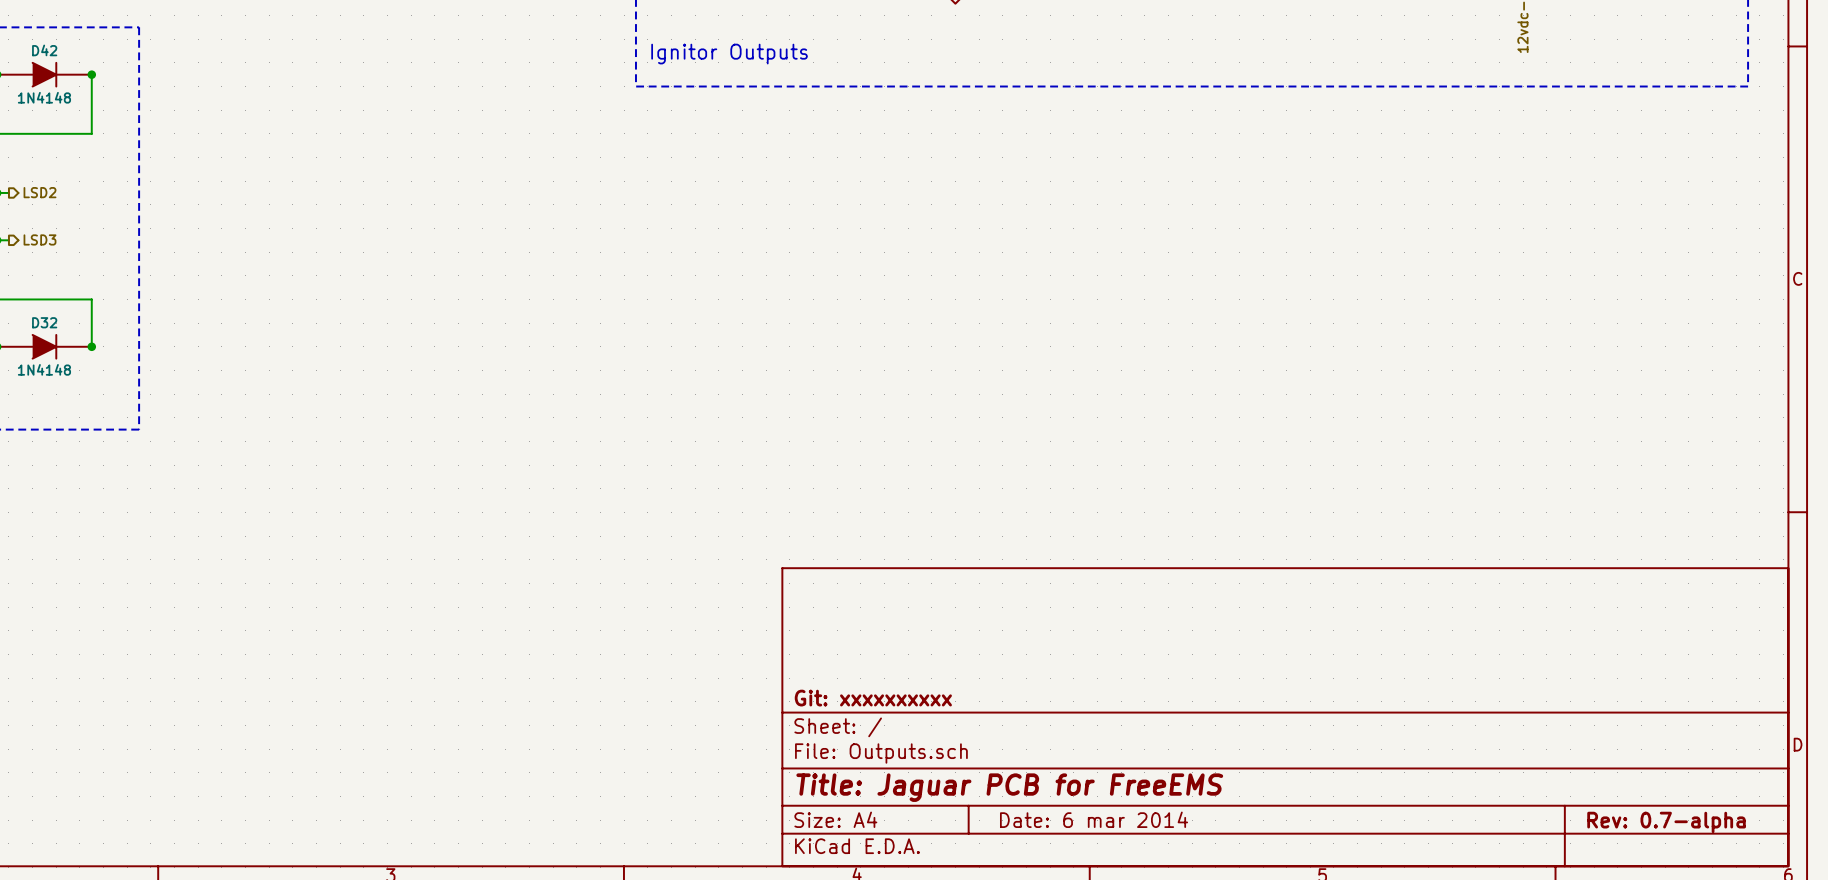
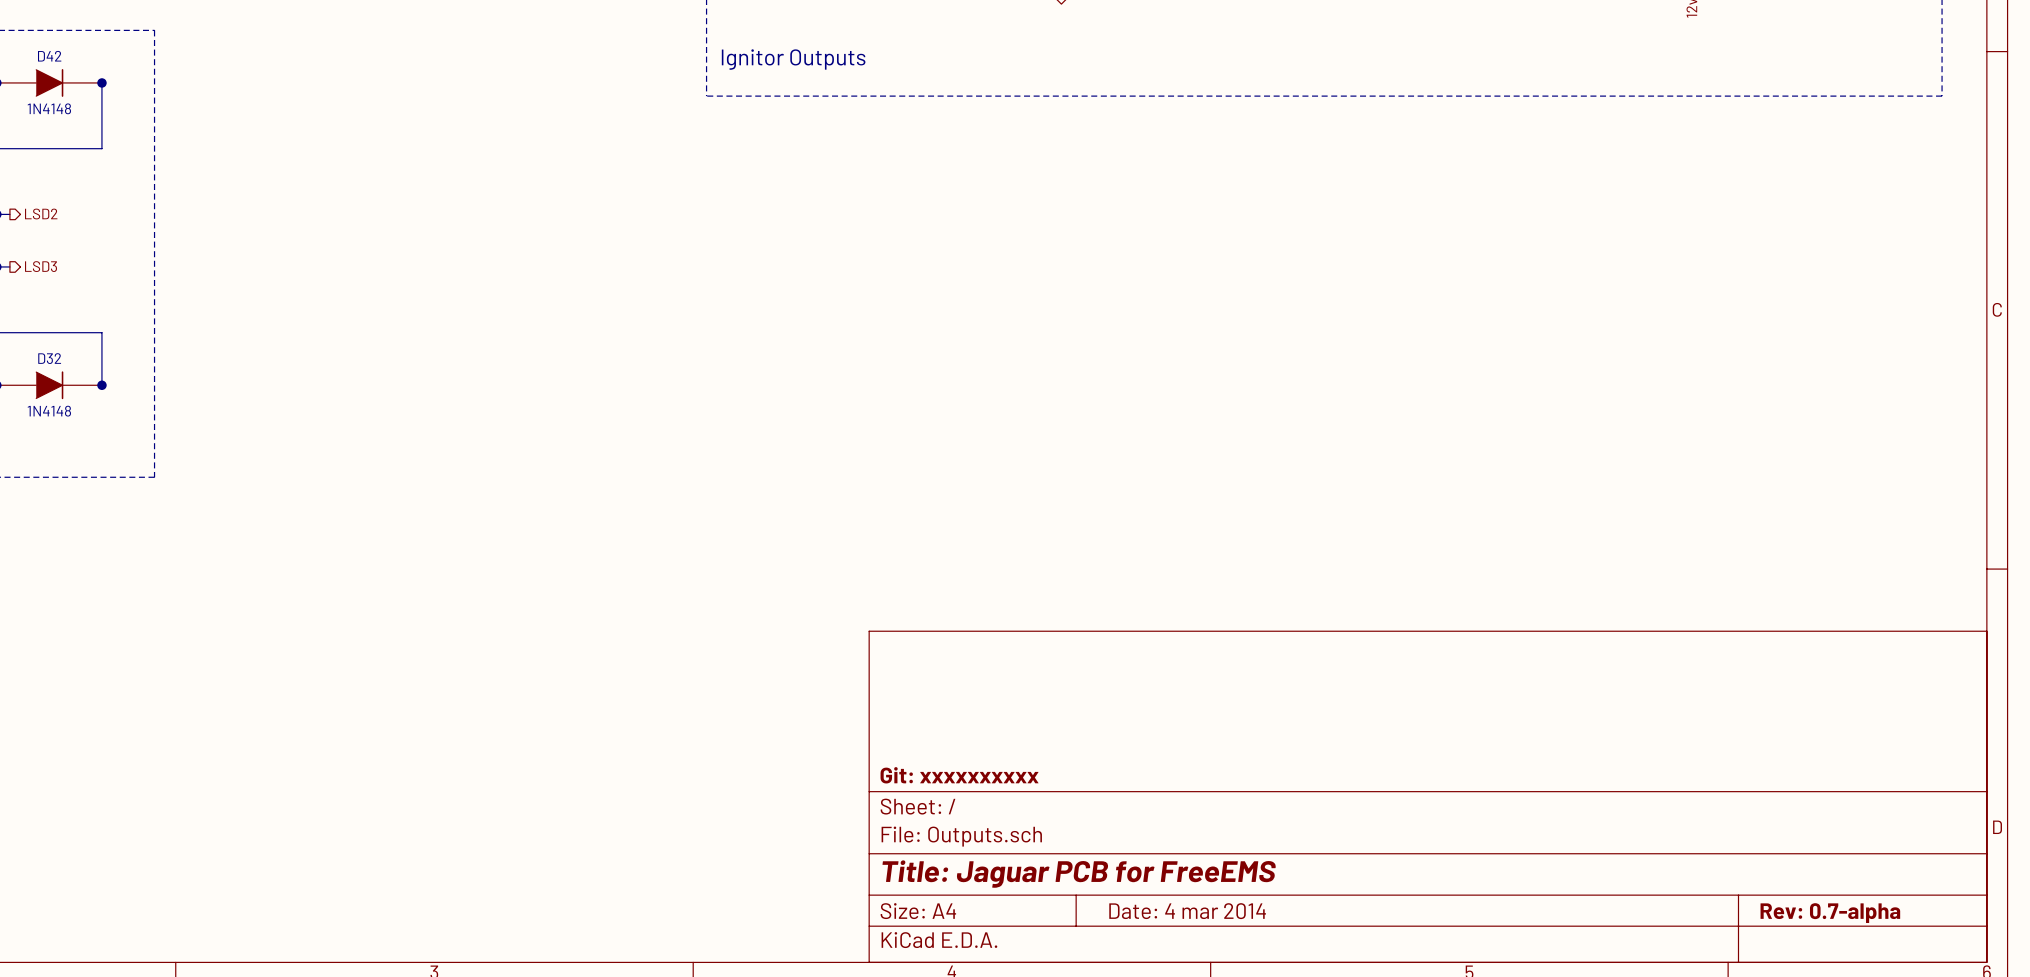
title block: Date: 6 mar 2014 (1094, 819) -> Date: 4 mar 2014 (1187, 911)

